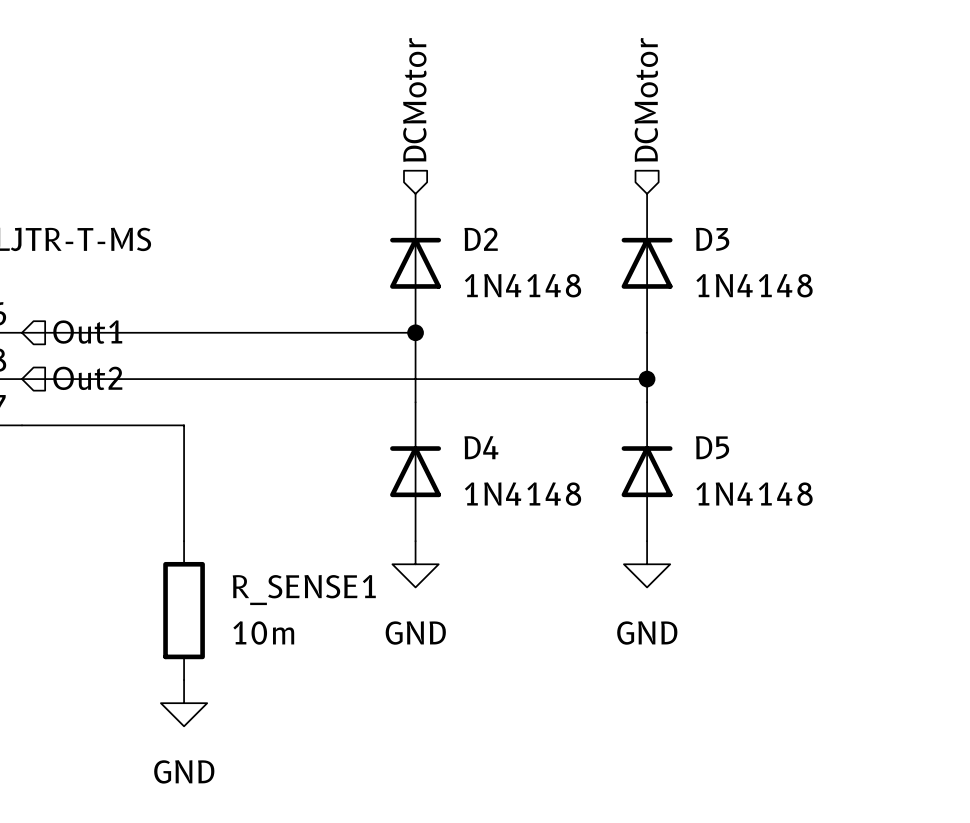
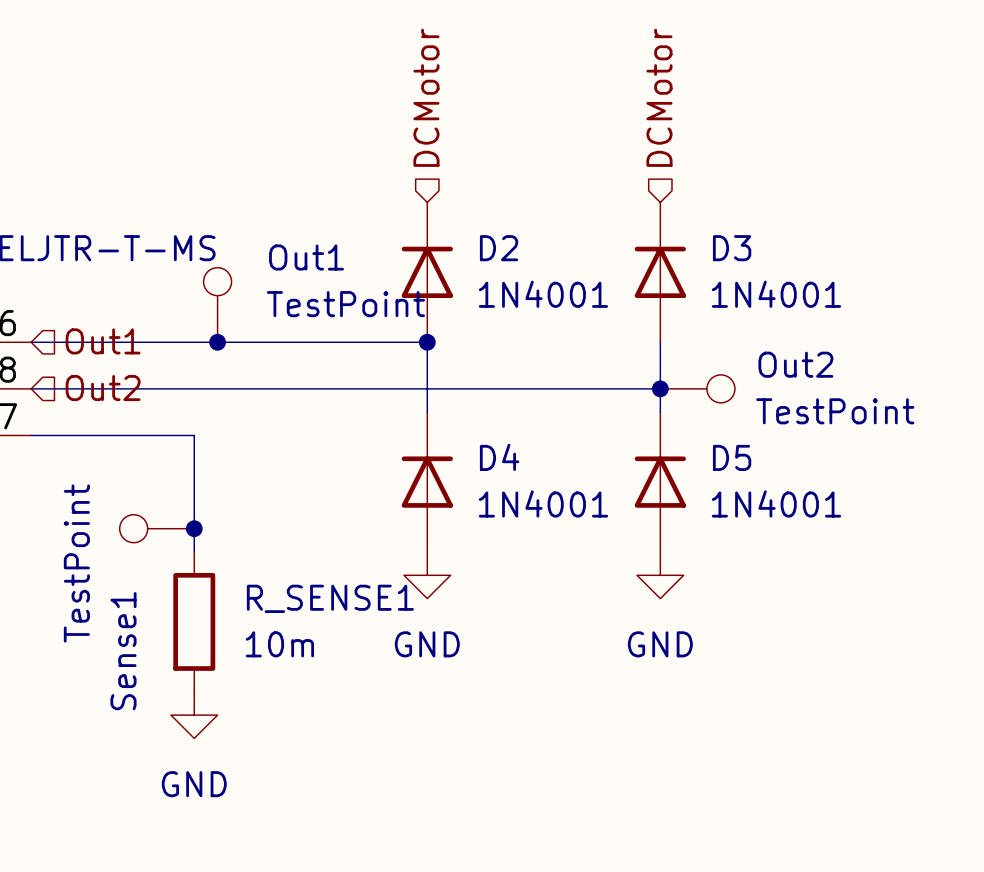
D2 value: 1N4148 (523, 285) -> 1N4001 (543, 294)
D3 value: 1N4148 (754, 285) -> 1N4001 (776, 294)
Out1: none -> TestPoint (217, 304)
junction: none -> (217, 342)
Out2: none -> TestPoint (697, 388)
D4 value: 1N4148 (523, 494) -> 1N4001 (543, 503)
D5 value: 1N4148 (754, 494) -> 1N4001 (776, 503)
Sense1: none -> TestPoint (156, 528)
junction: none -> (194, 528)

